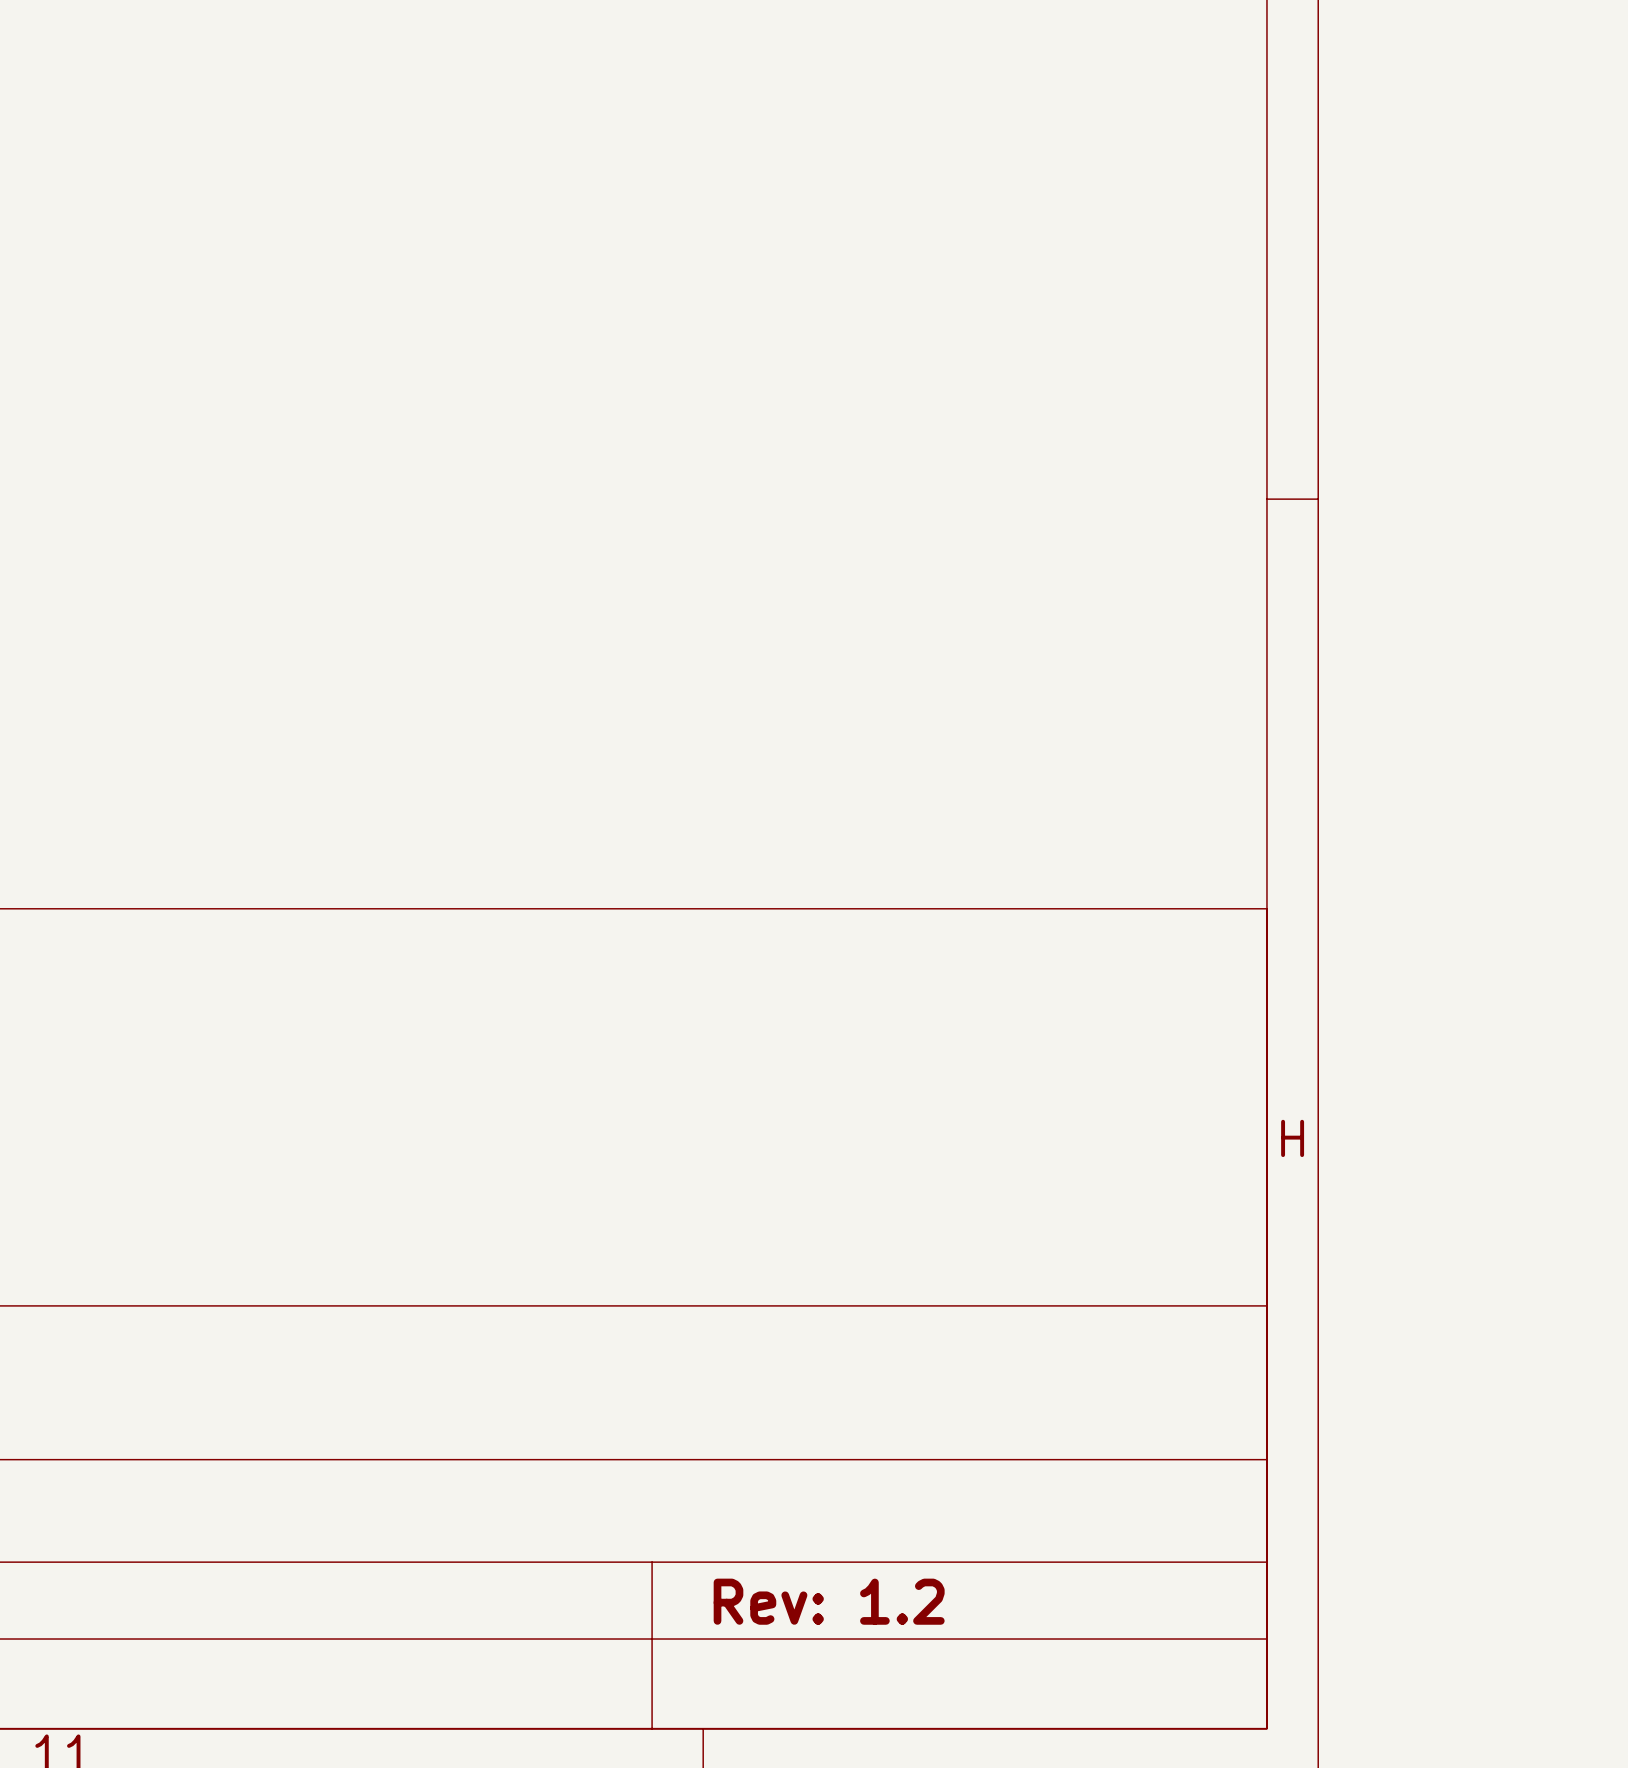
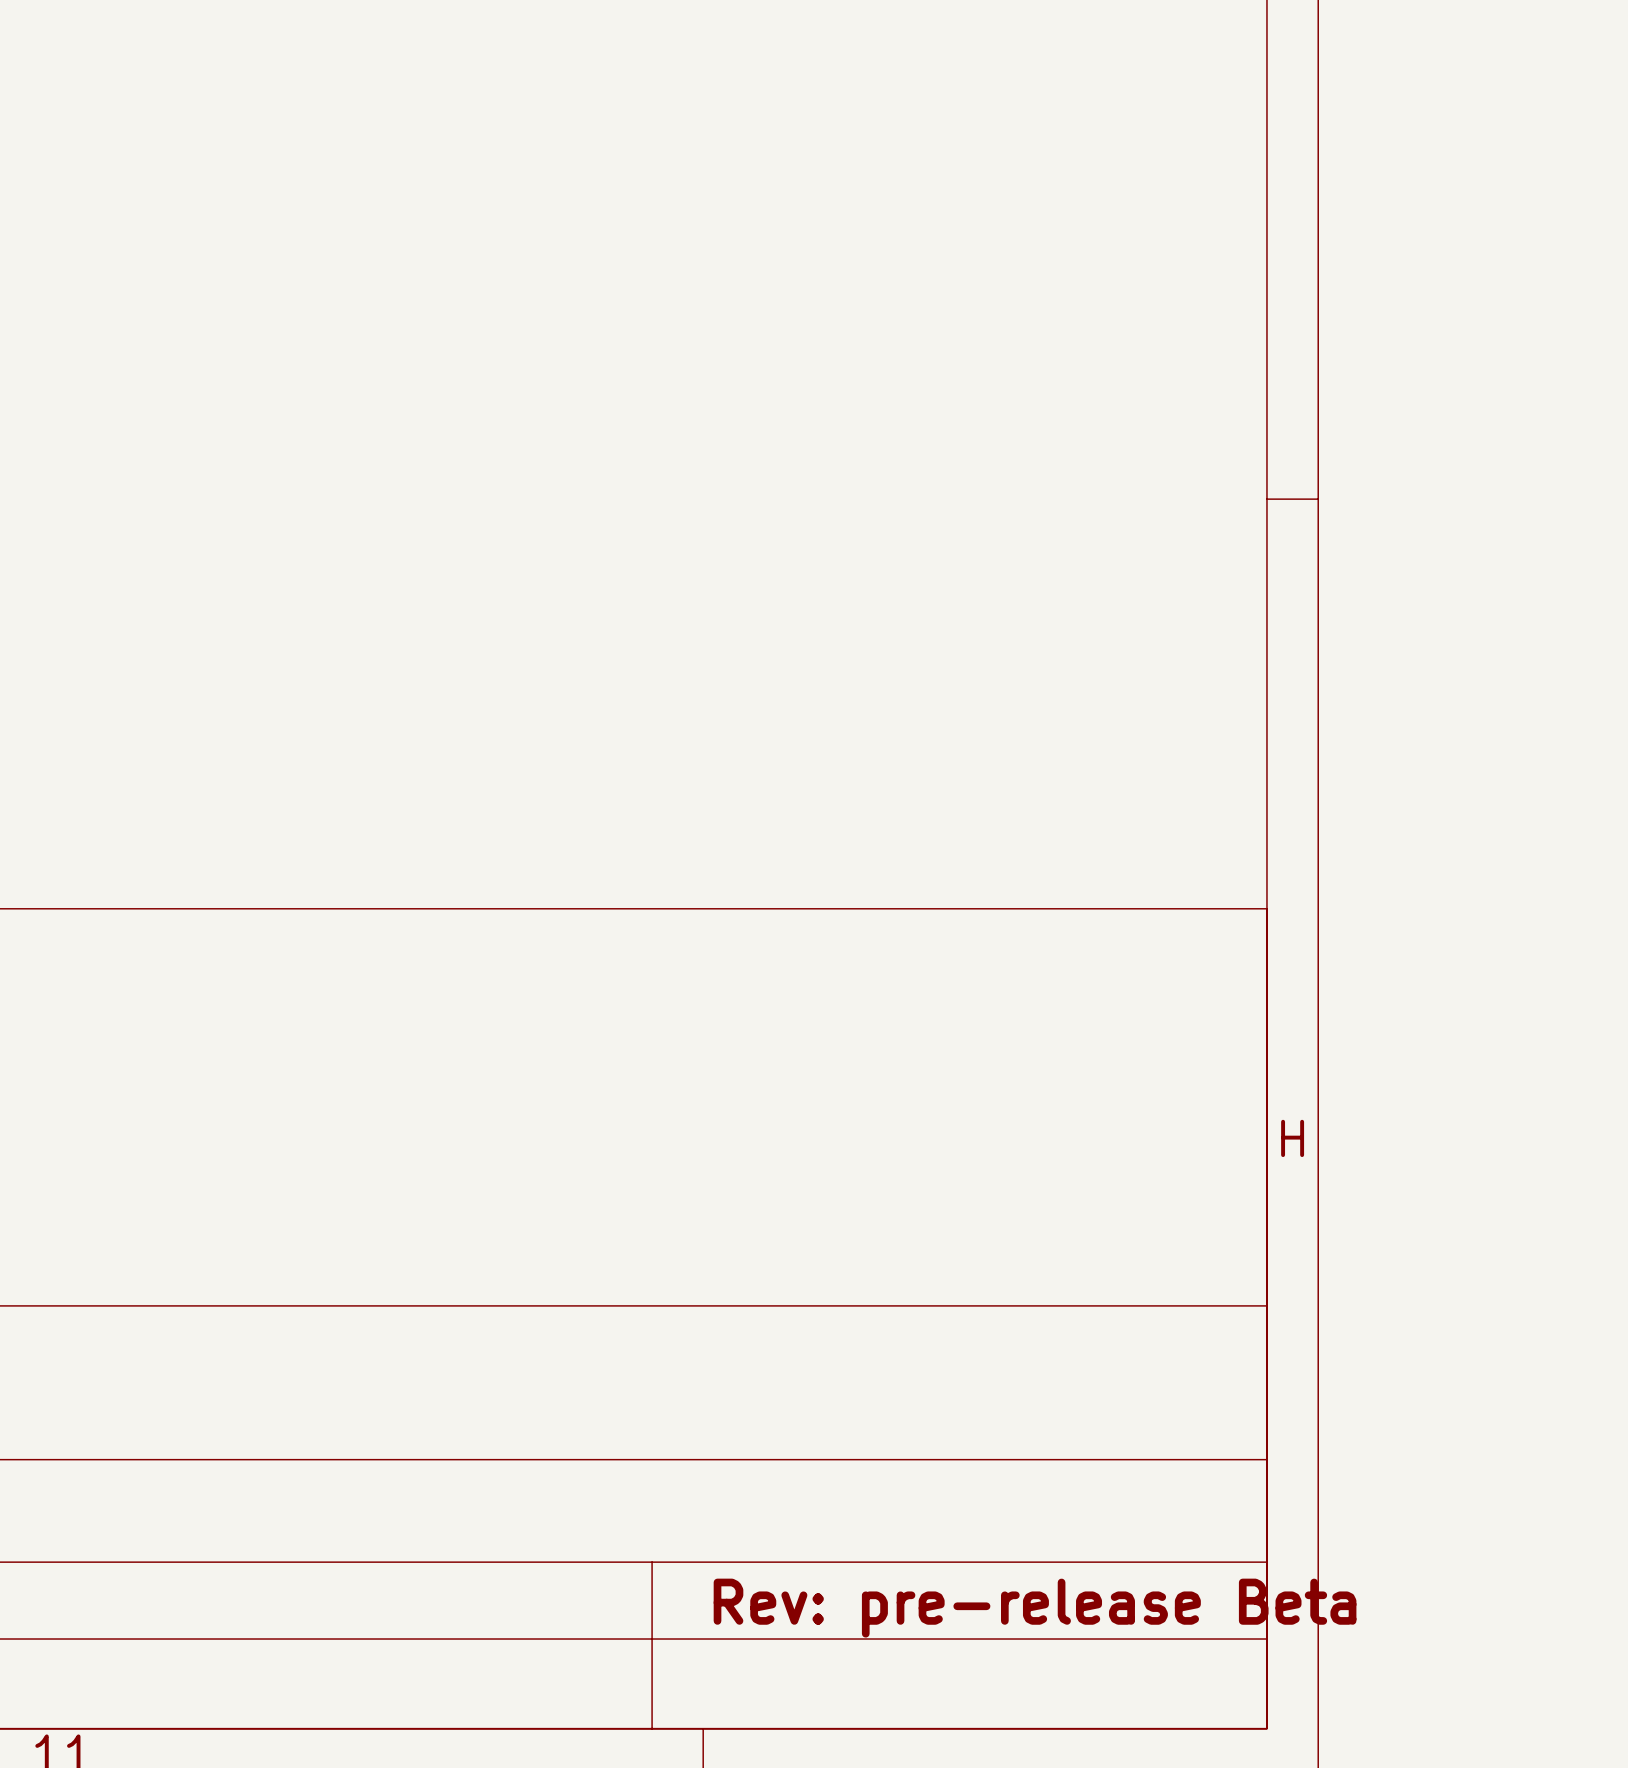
title block: Rev: 1.2 (829, 1601) -> Rev: pre-release Beta (1035, 1608)

